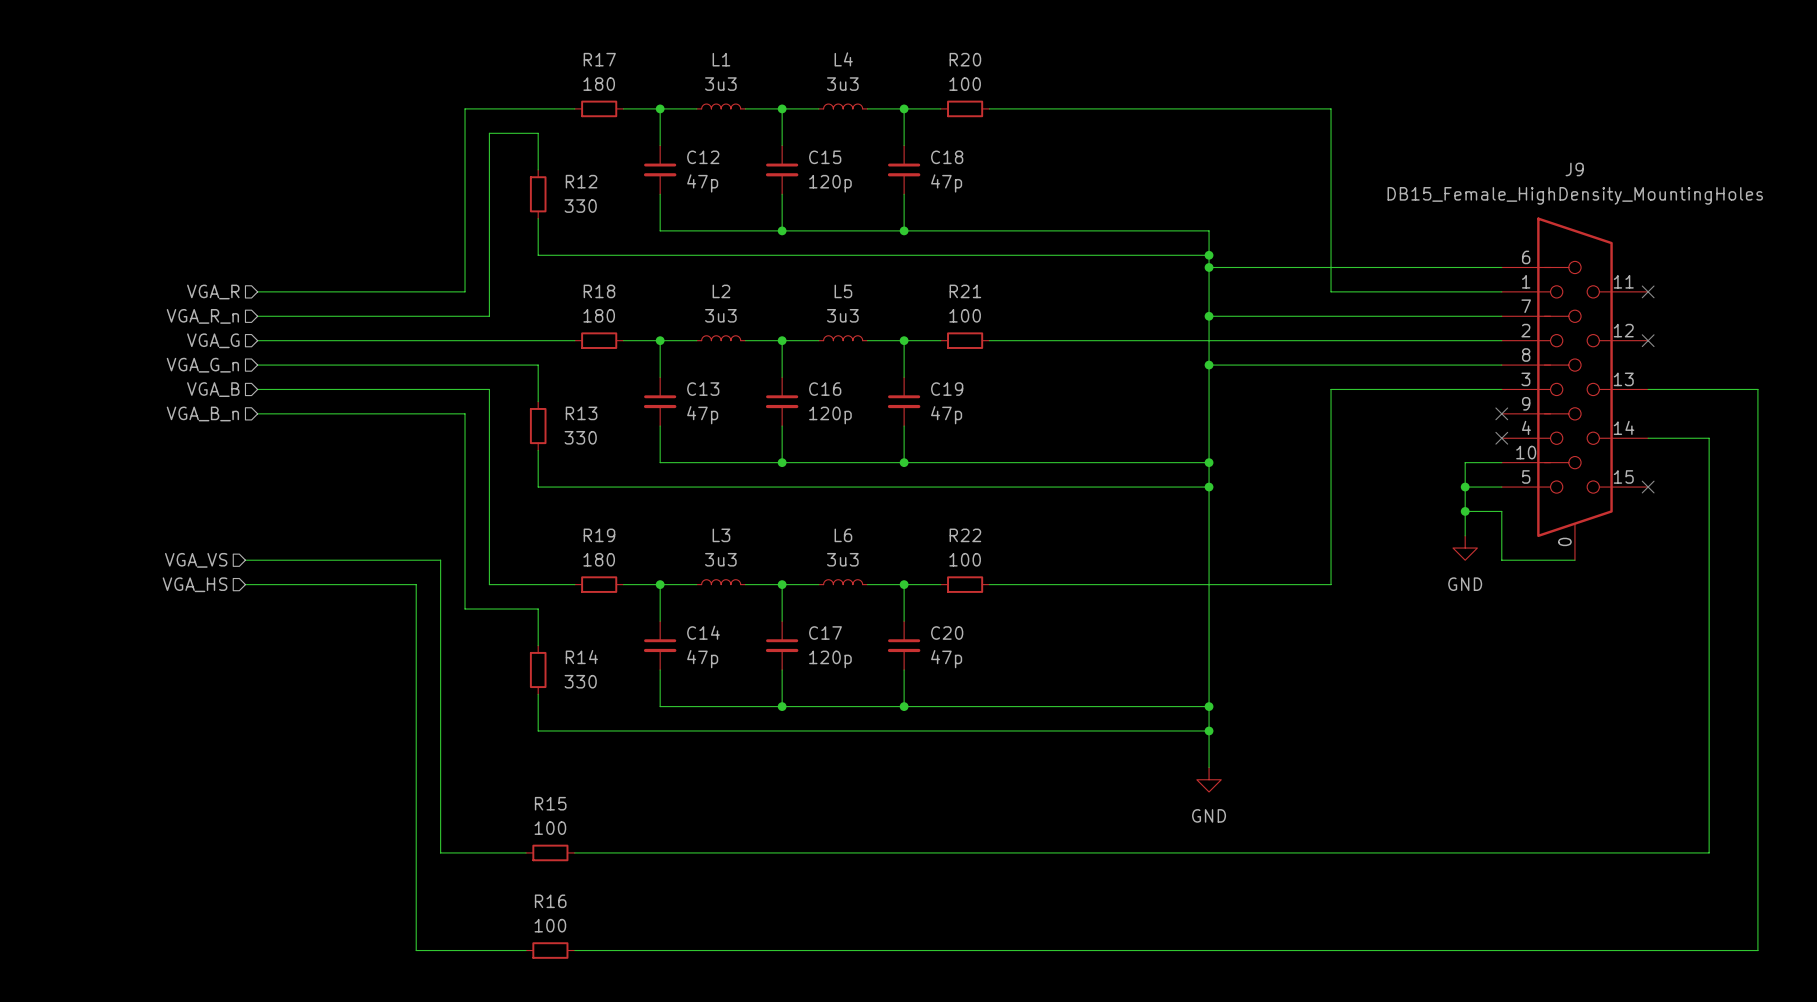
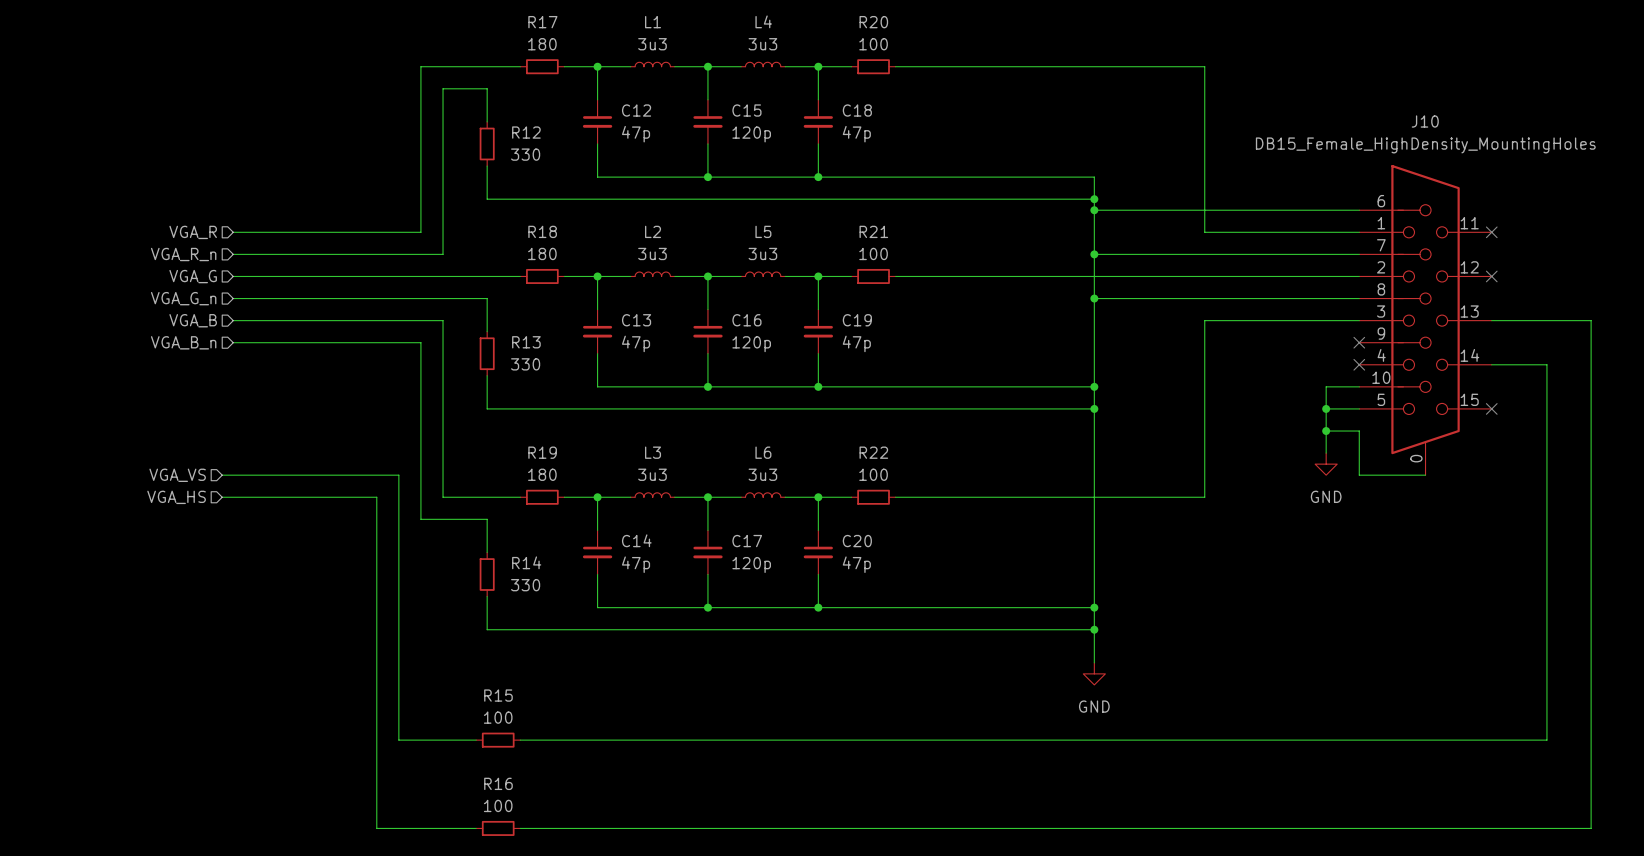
J9 name: J9 (1574, 169) -> J10 (1425, 121)

